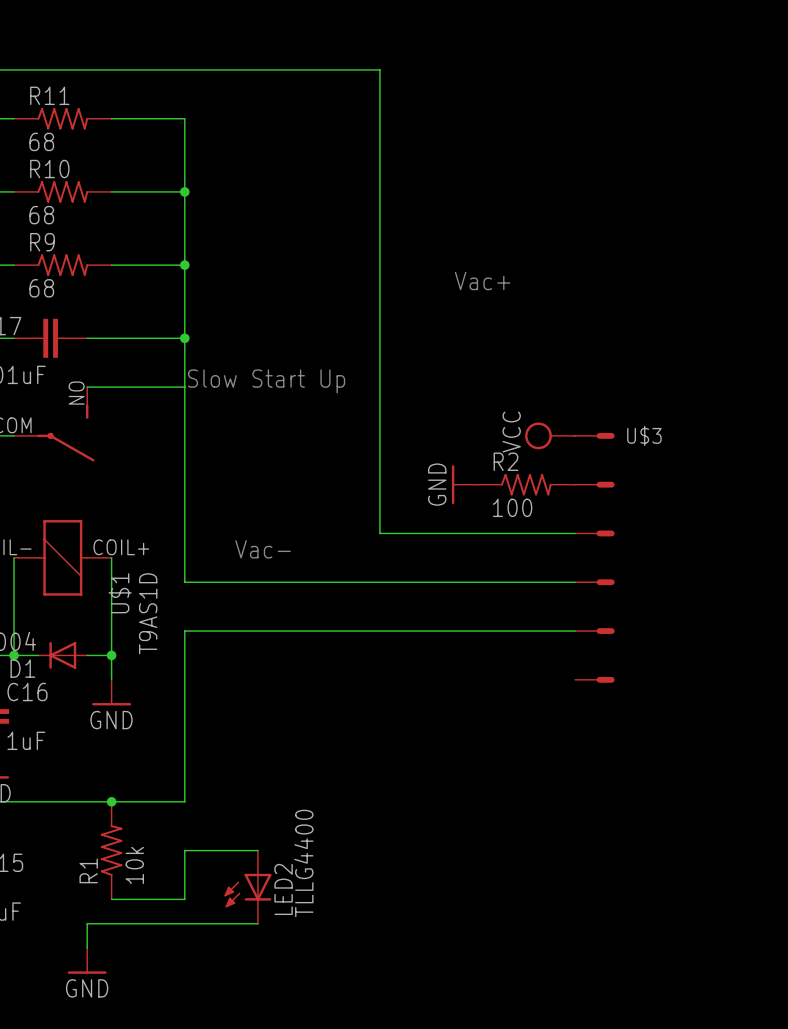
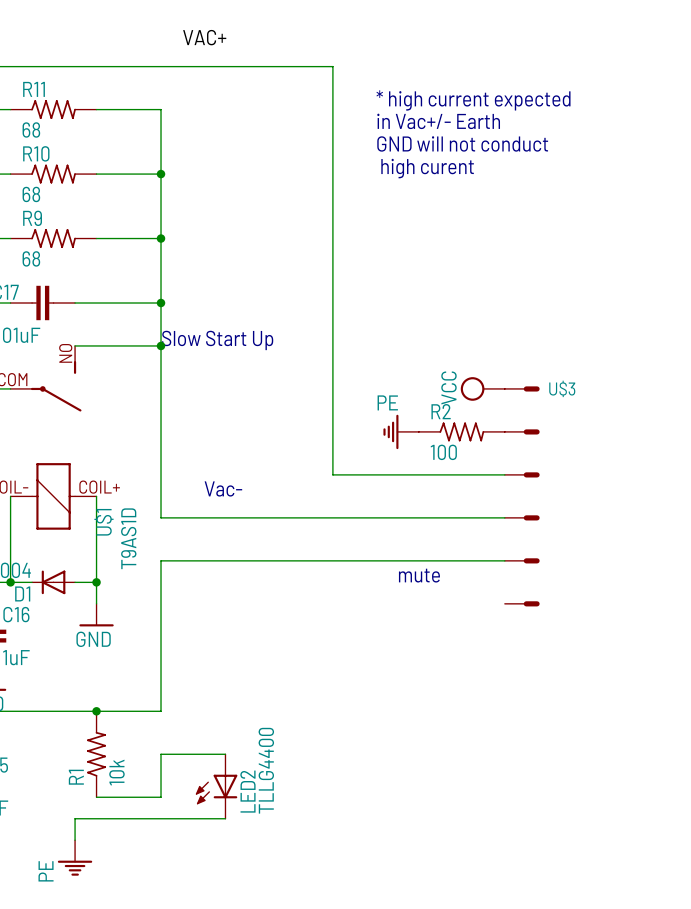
label: none -> VAC+ (204, 37)
text: none -> * high current expected (473, 100)
text: none -> in Vac+/- Earth (438, 121)
text: none -> GND will not conduct (462, 143)
text: none -> high curent (427, 168)
text: Vac+ (482, 280) -> none
junction: none -> (161, 345)
power symbol: GND (464, 484) -> PE (401, 431)
text: none -> mute (419, 575)
power symbol: GND (87, 960) -> PE (75, 857)

